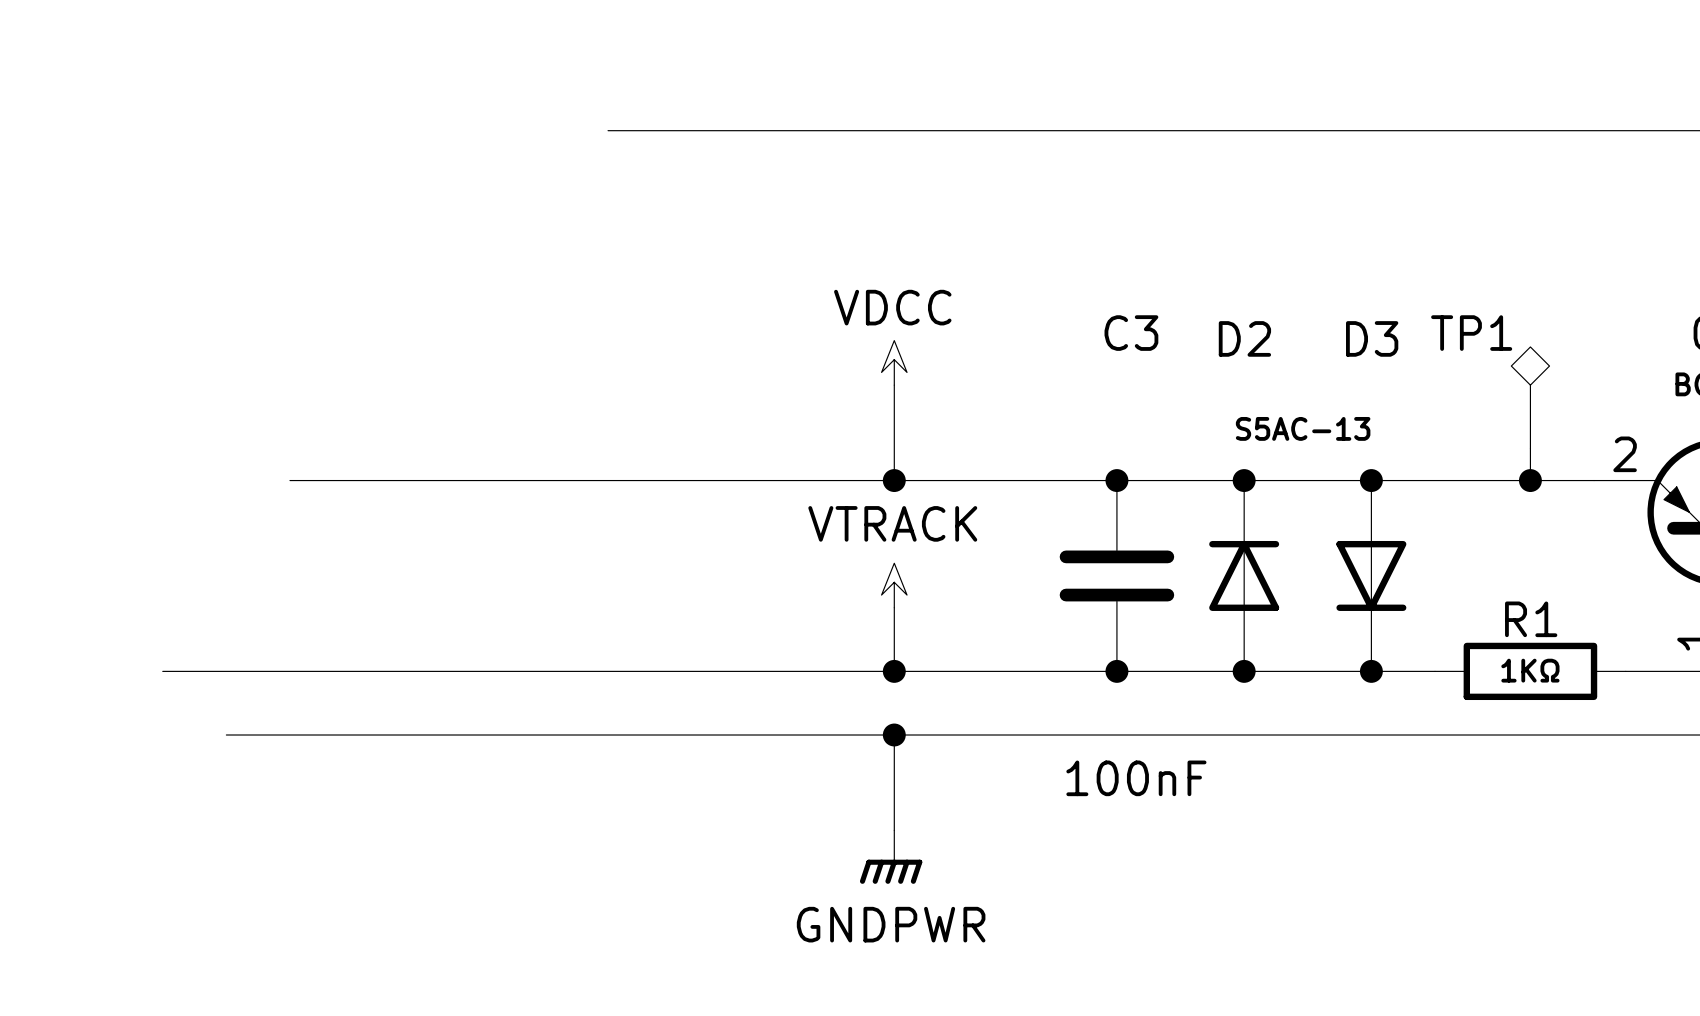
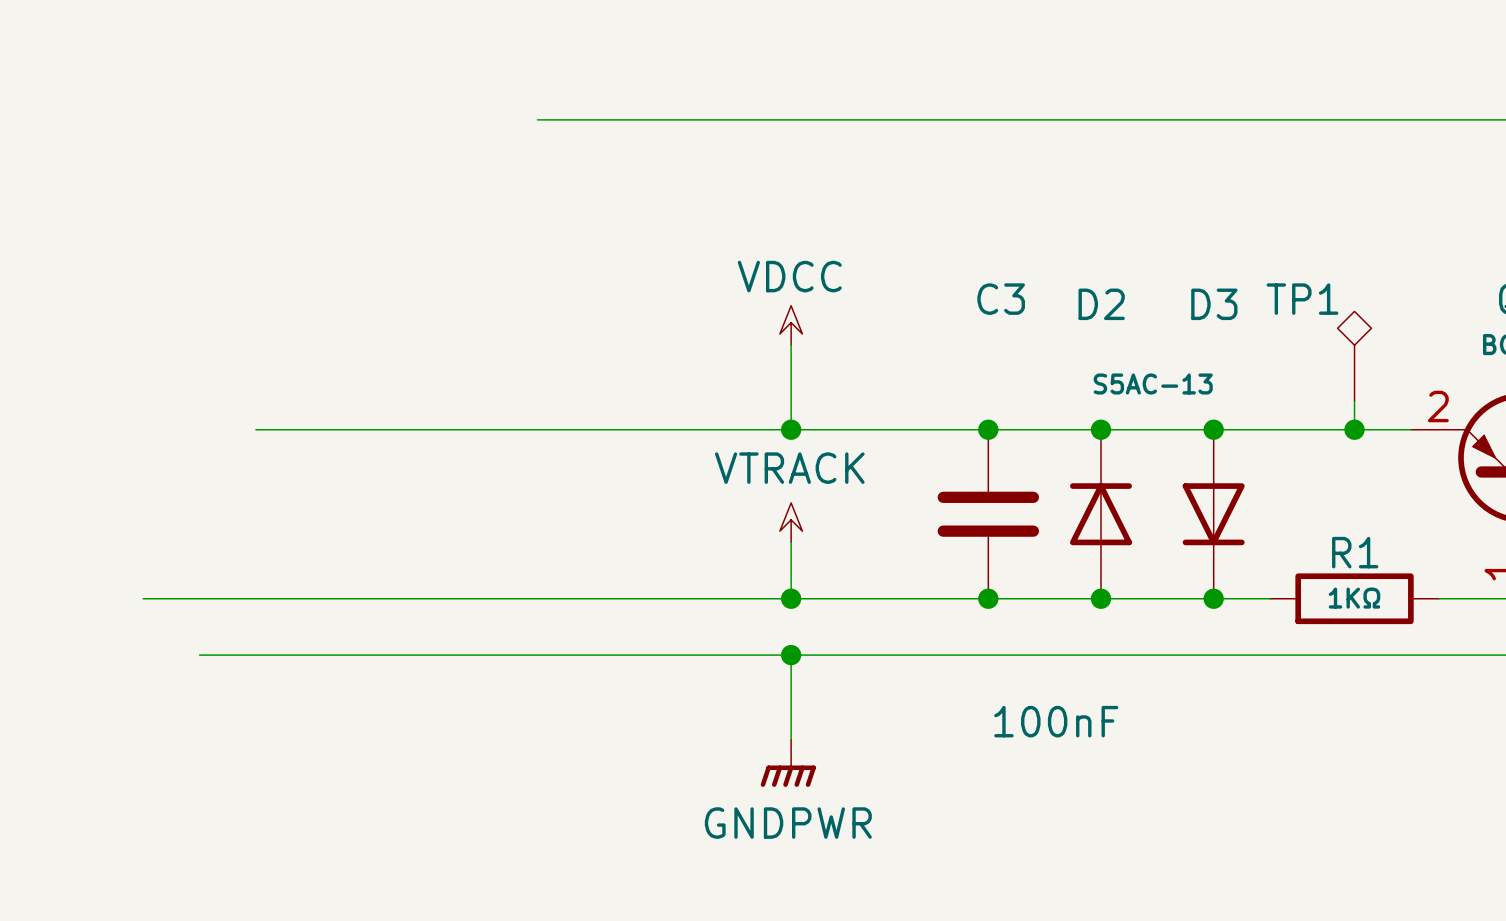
C3 value position: 100nF (1136, 778) -> 100nF (1056, 721)

